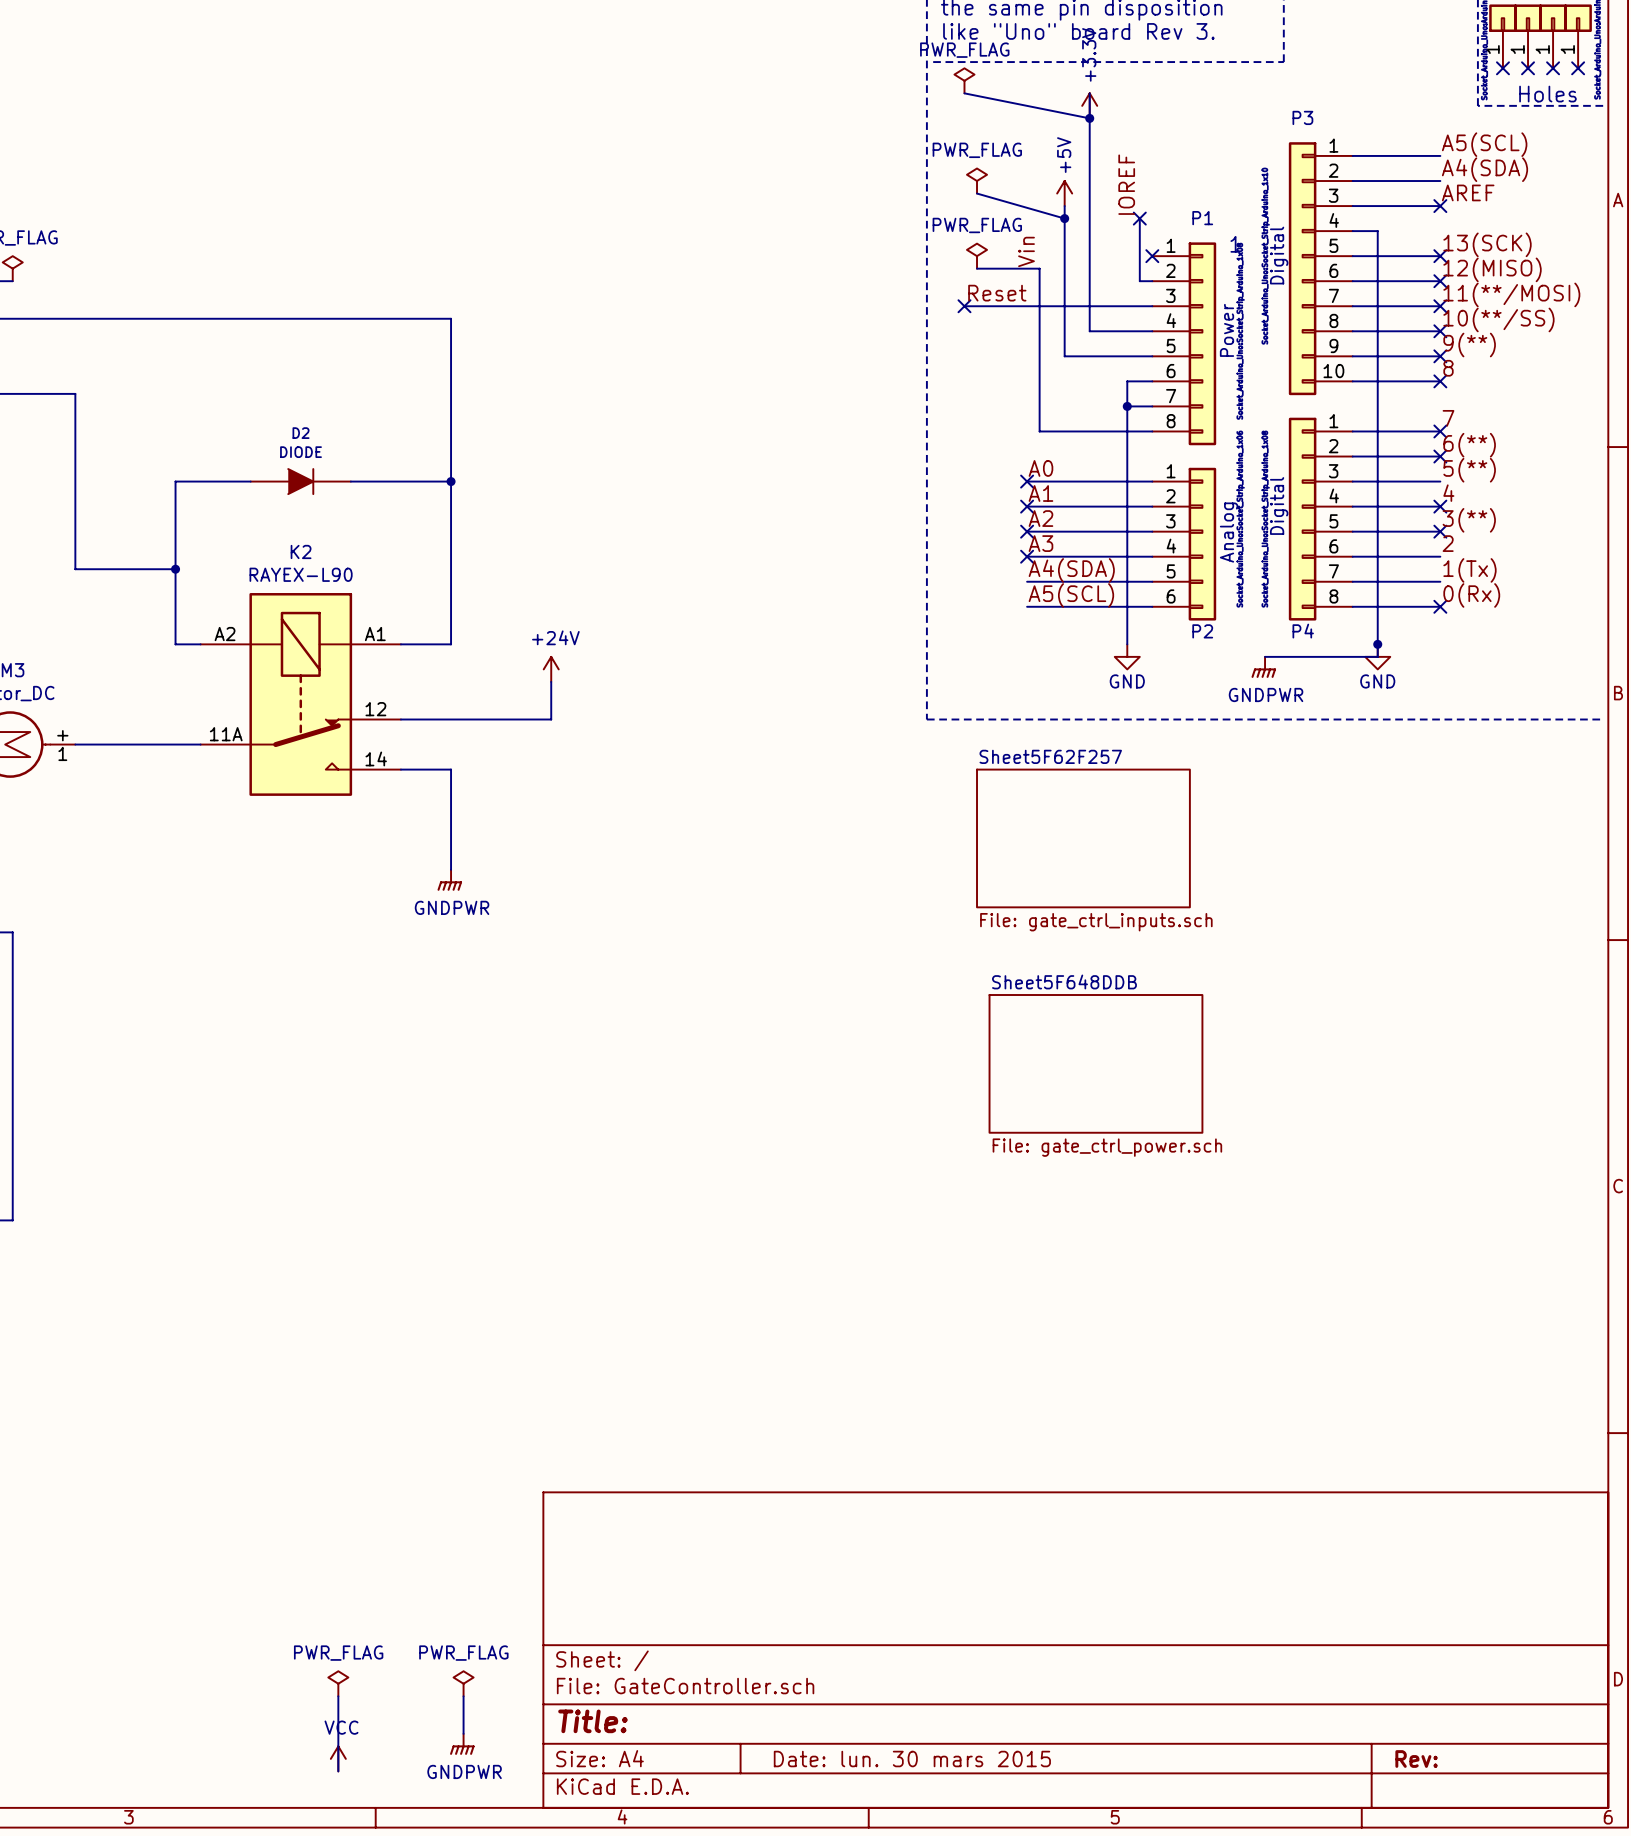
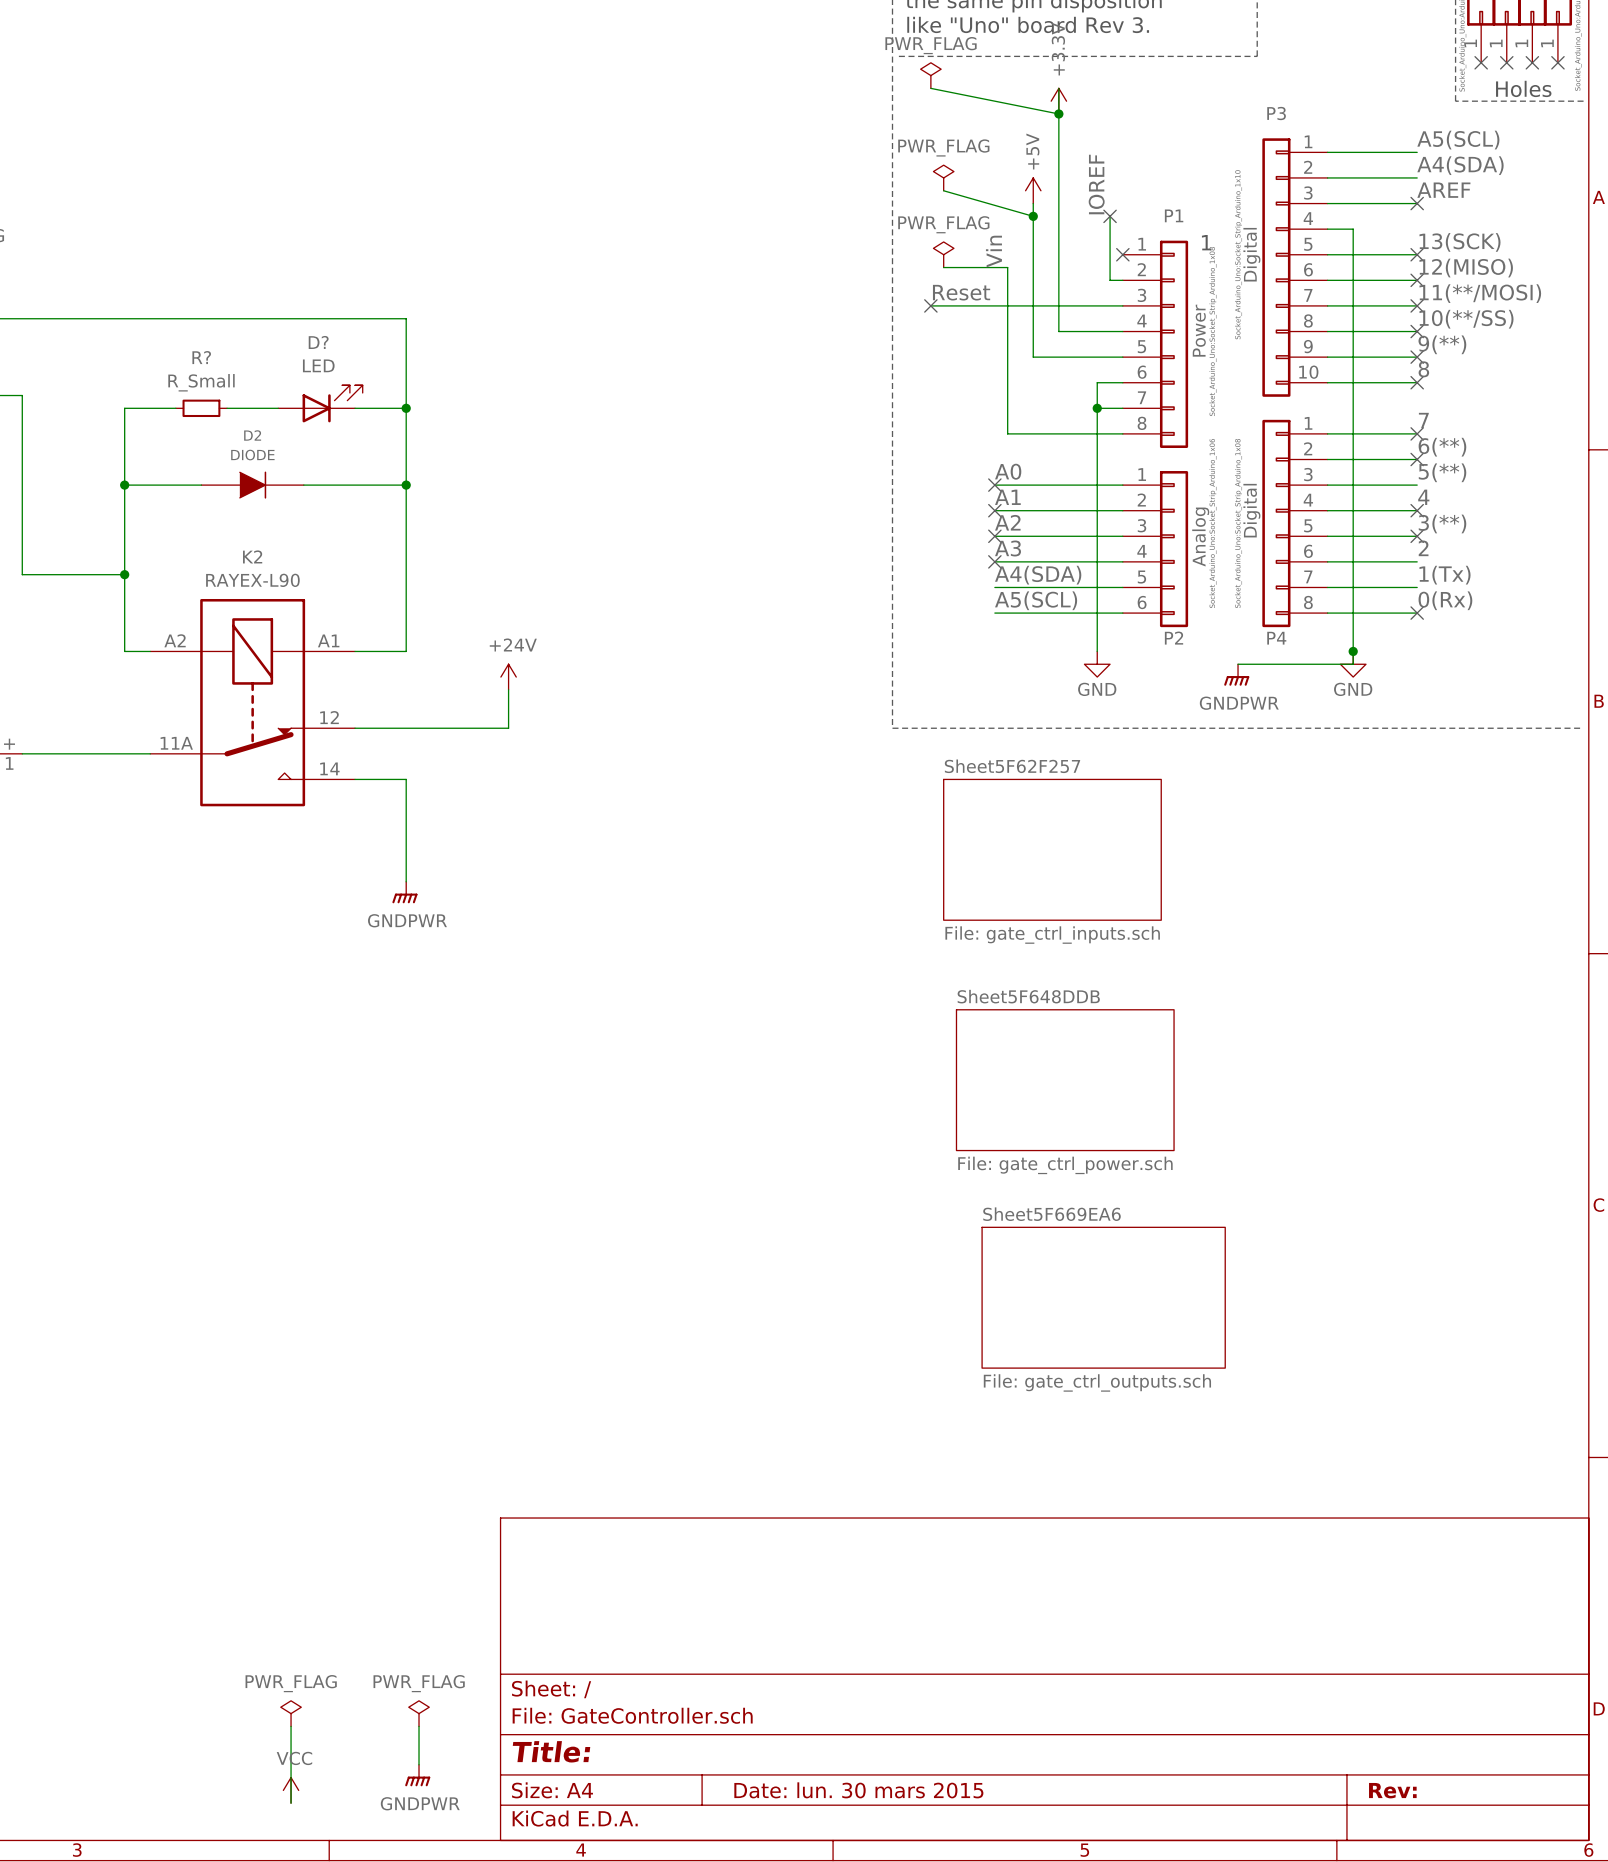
D?: none -> LED (320, 403)
wire: none -> (175, 408) (124, 408) (124, 485)
R?: none -> R_Small (201, 408)
wire: none -> (227, 408) (278, 408)
wire: none -> (355, 408) (406, 408)
junction: none -> (406, 408)
junction: none -> (124, 485)
sheet Sheet5F669EA6: none -> File: gate_ctrl_outputs.sch (1103, 1297)

